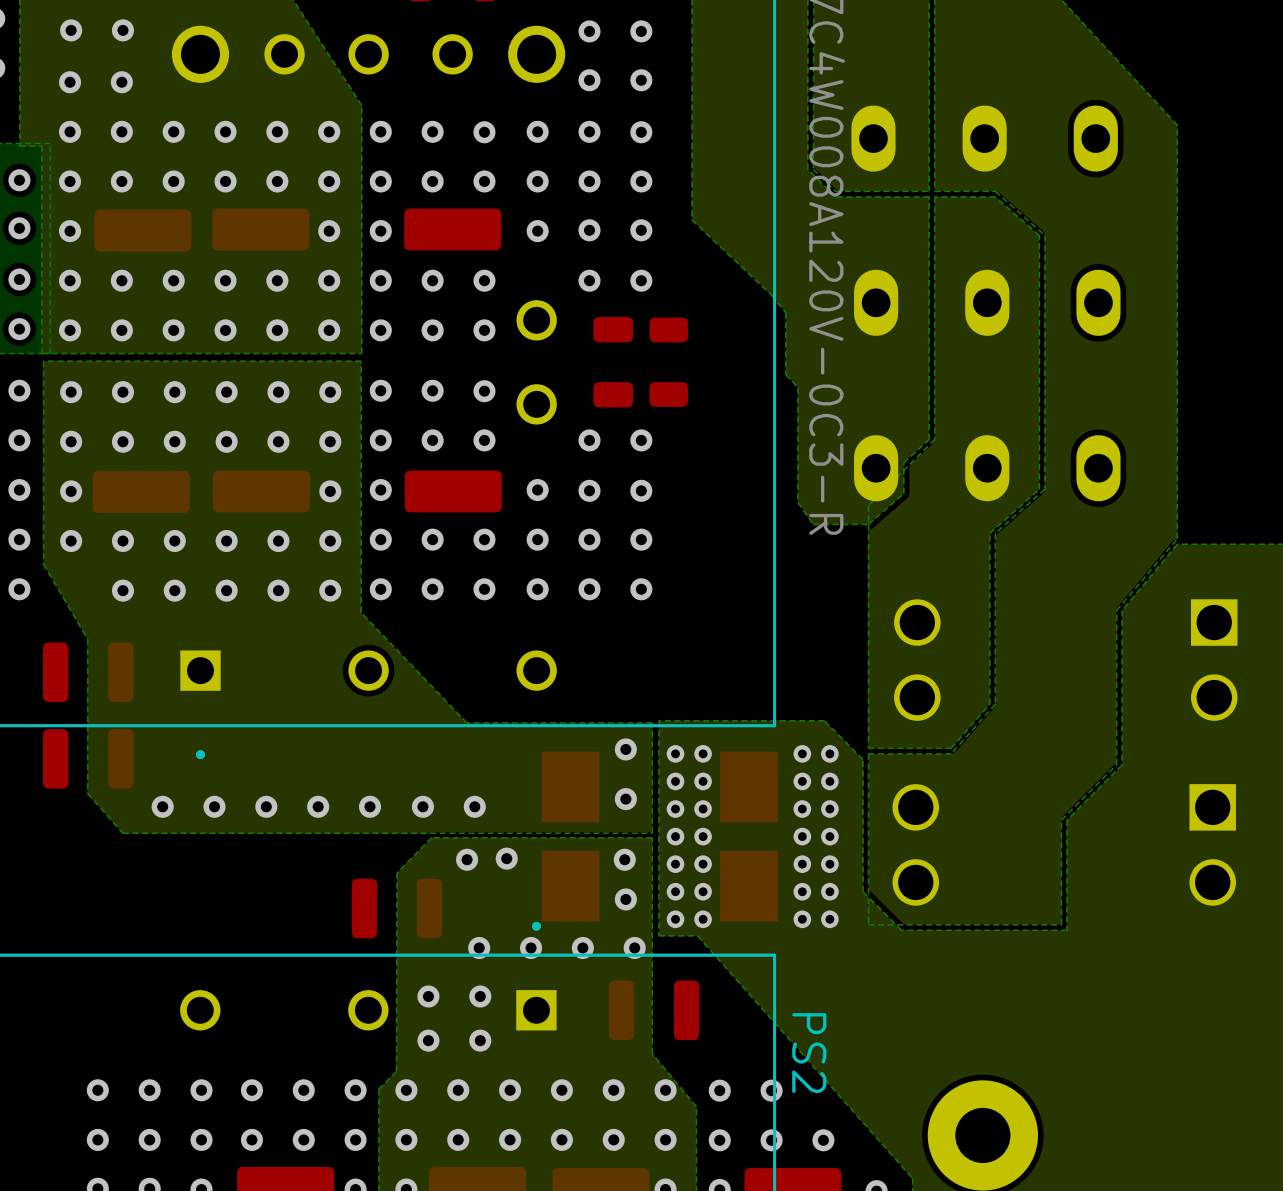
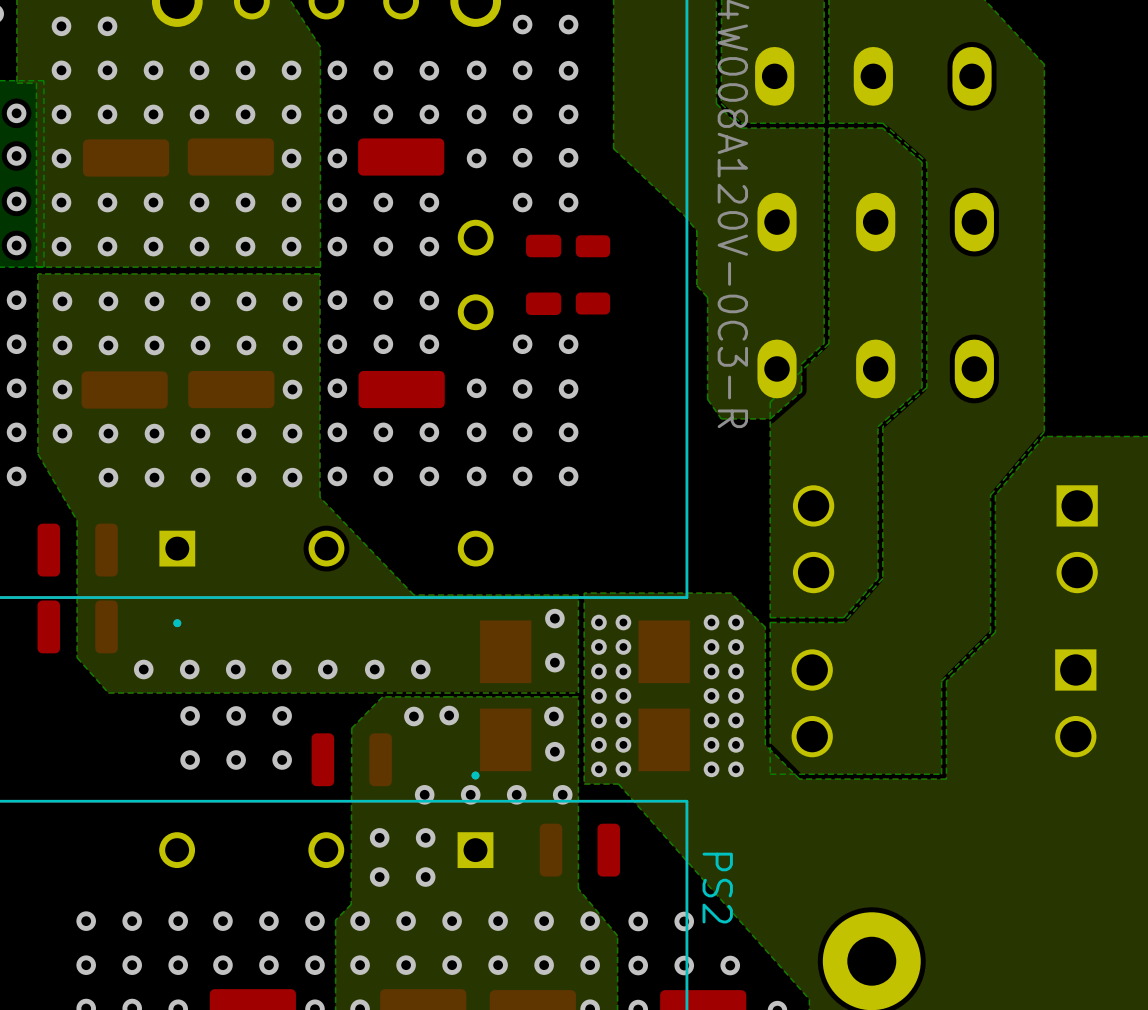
via: none -> (190, 715)
via: none -> (236, 715)
via: none -> (282, 715)
via: none -> (190, 760)
via: none -> (236, 760)
via: none -> (282, 760)

